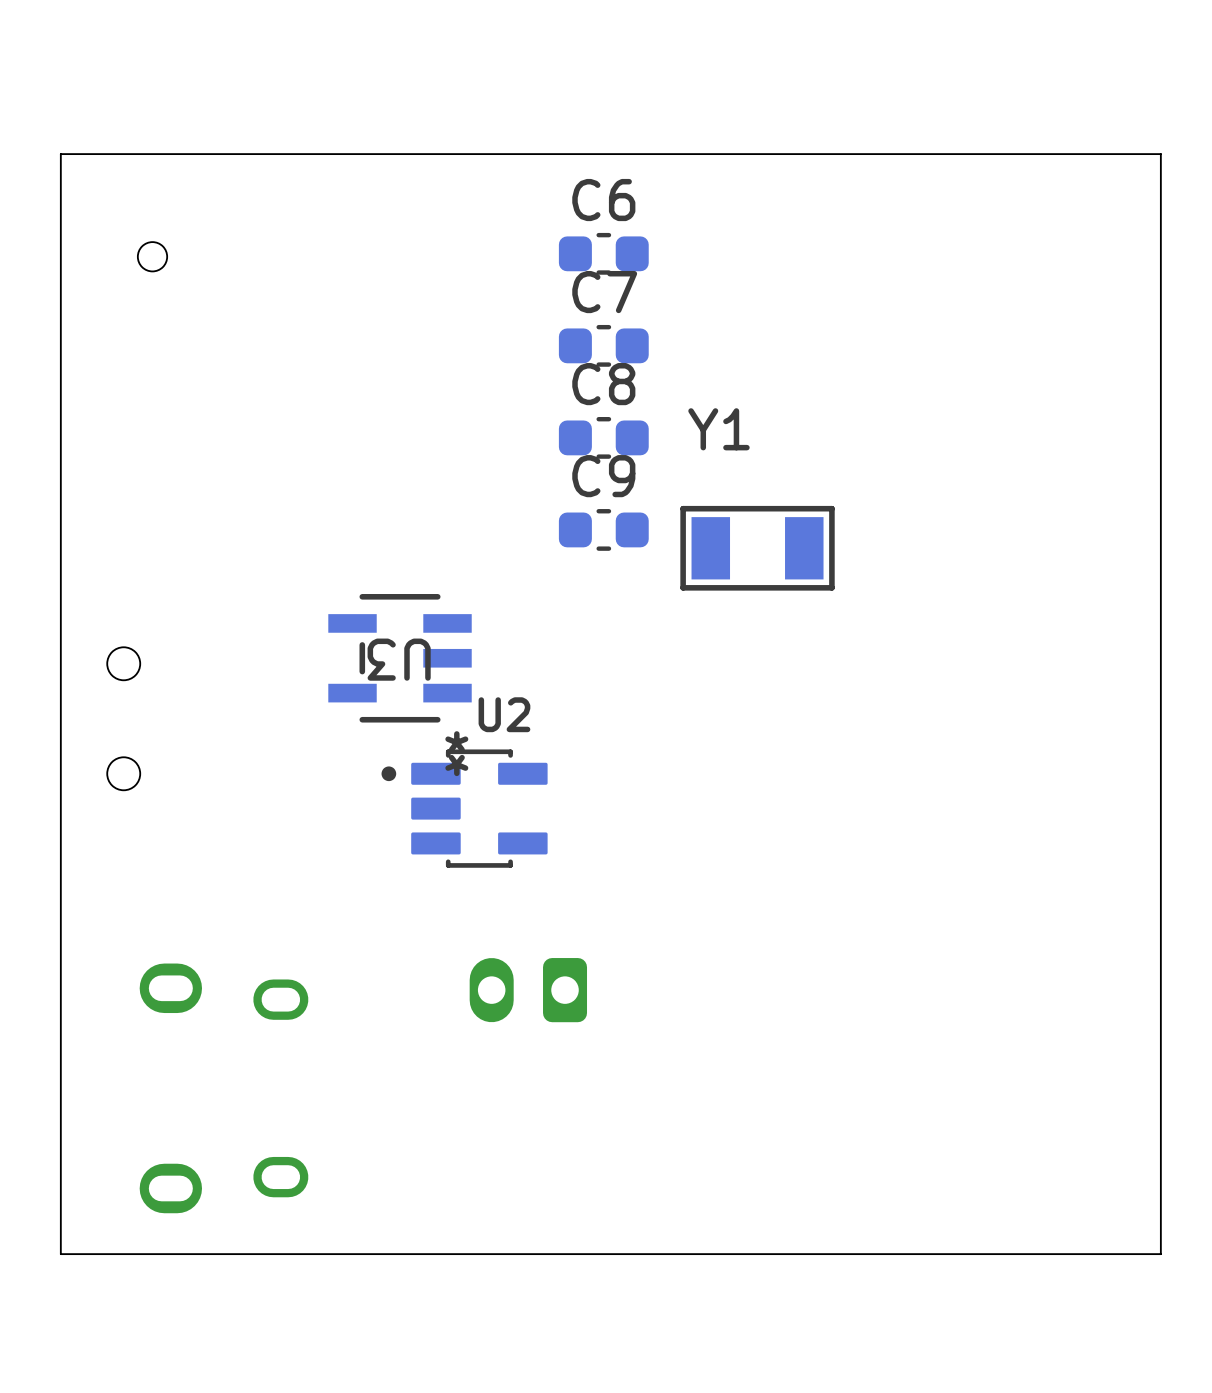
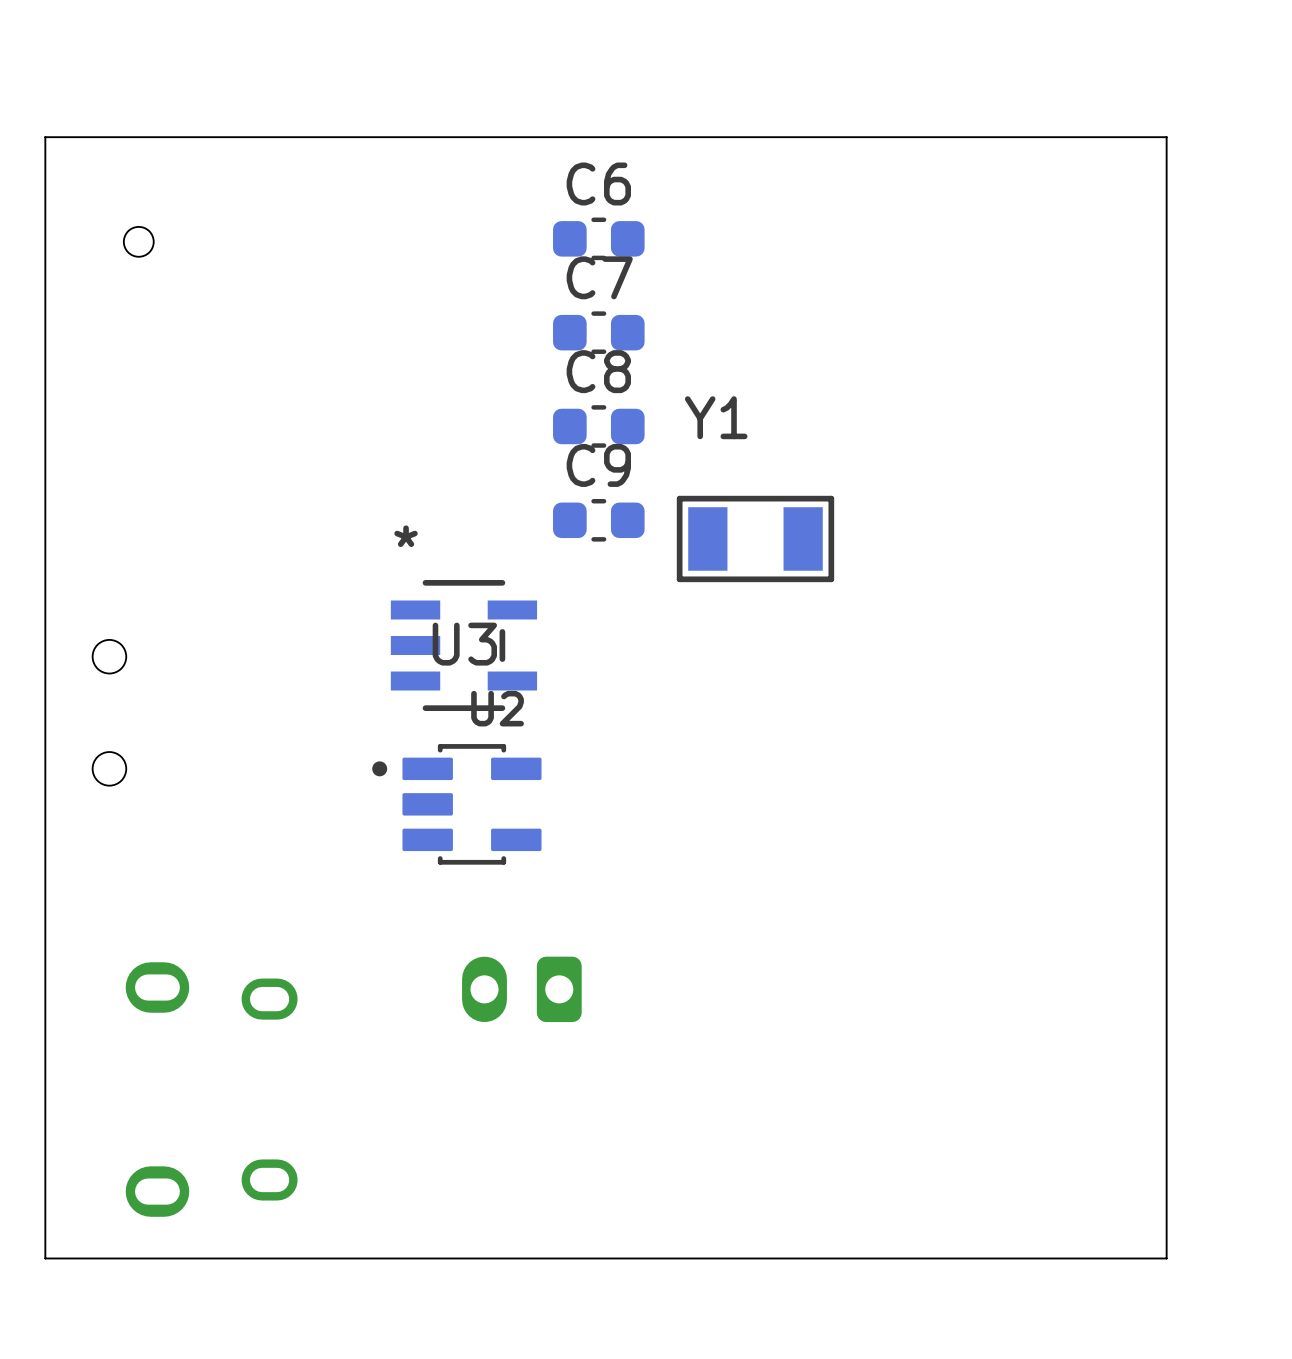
U3 rotation: 0° (400, 658) -> 180° (463, 645)

